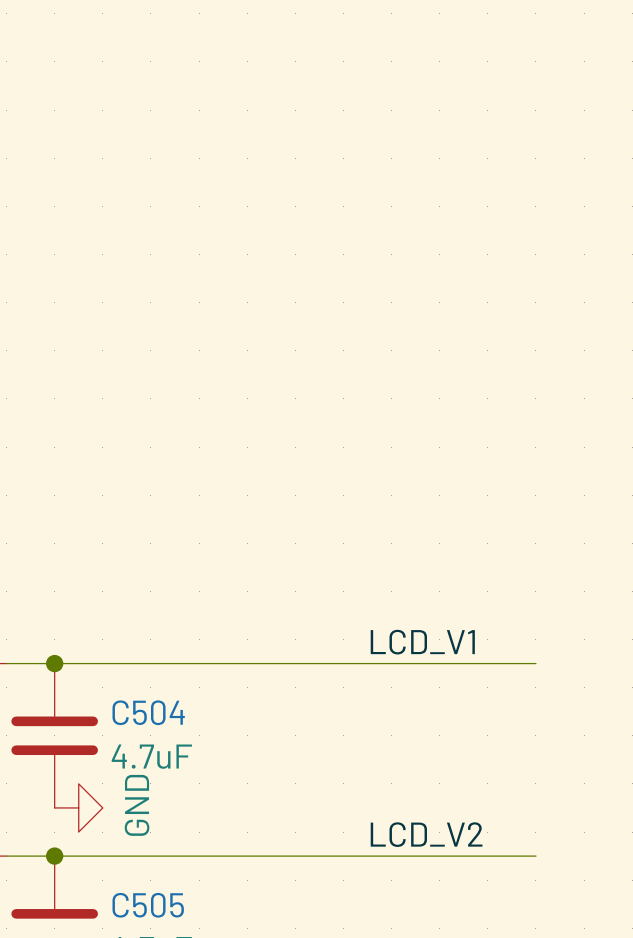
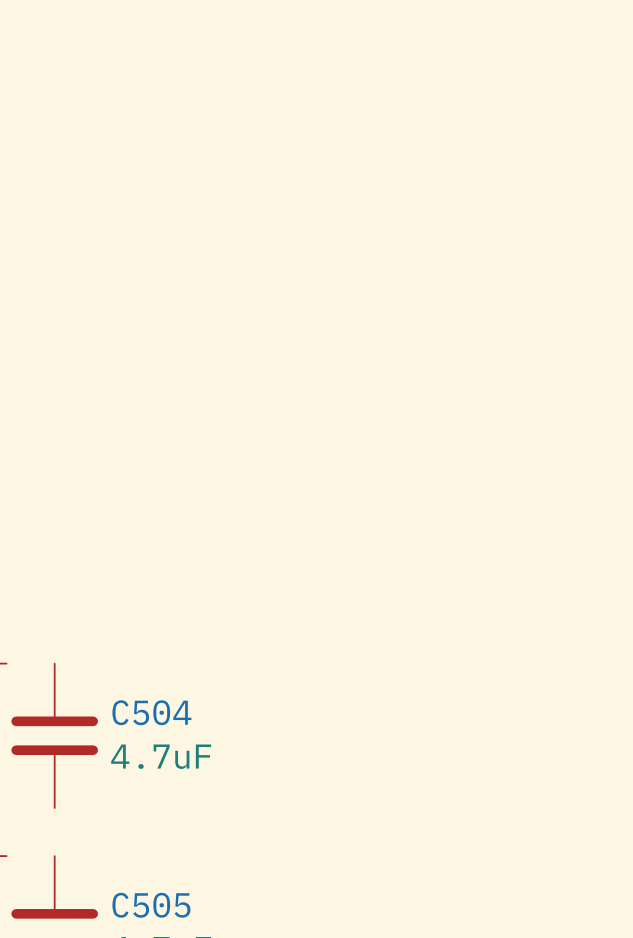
label: LCD_V1 (422, 642) -> none
wire: (6, 663) (535, 663) -> none
junction: (54, 663) -> none
power symbol: GND (78, 807) -> none
label: LCD_V2 (426, 834) -> none
wire: (6, 856) (535, 856) -> none
junction: (54, 856) -> none

